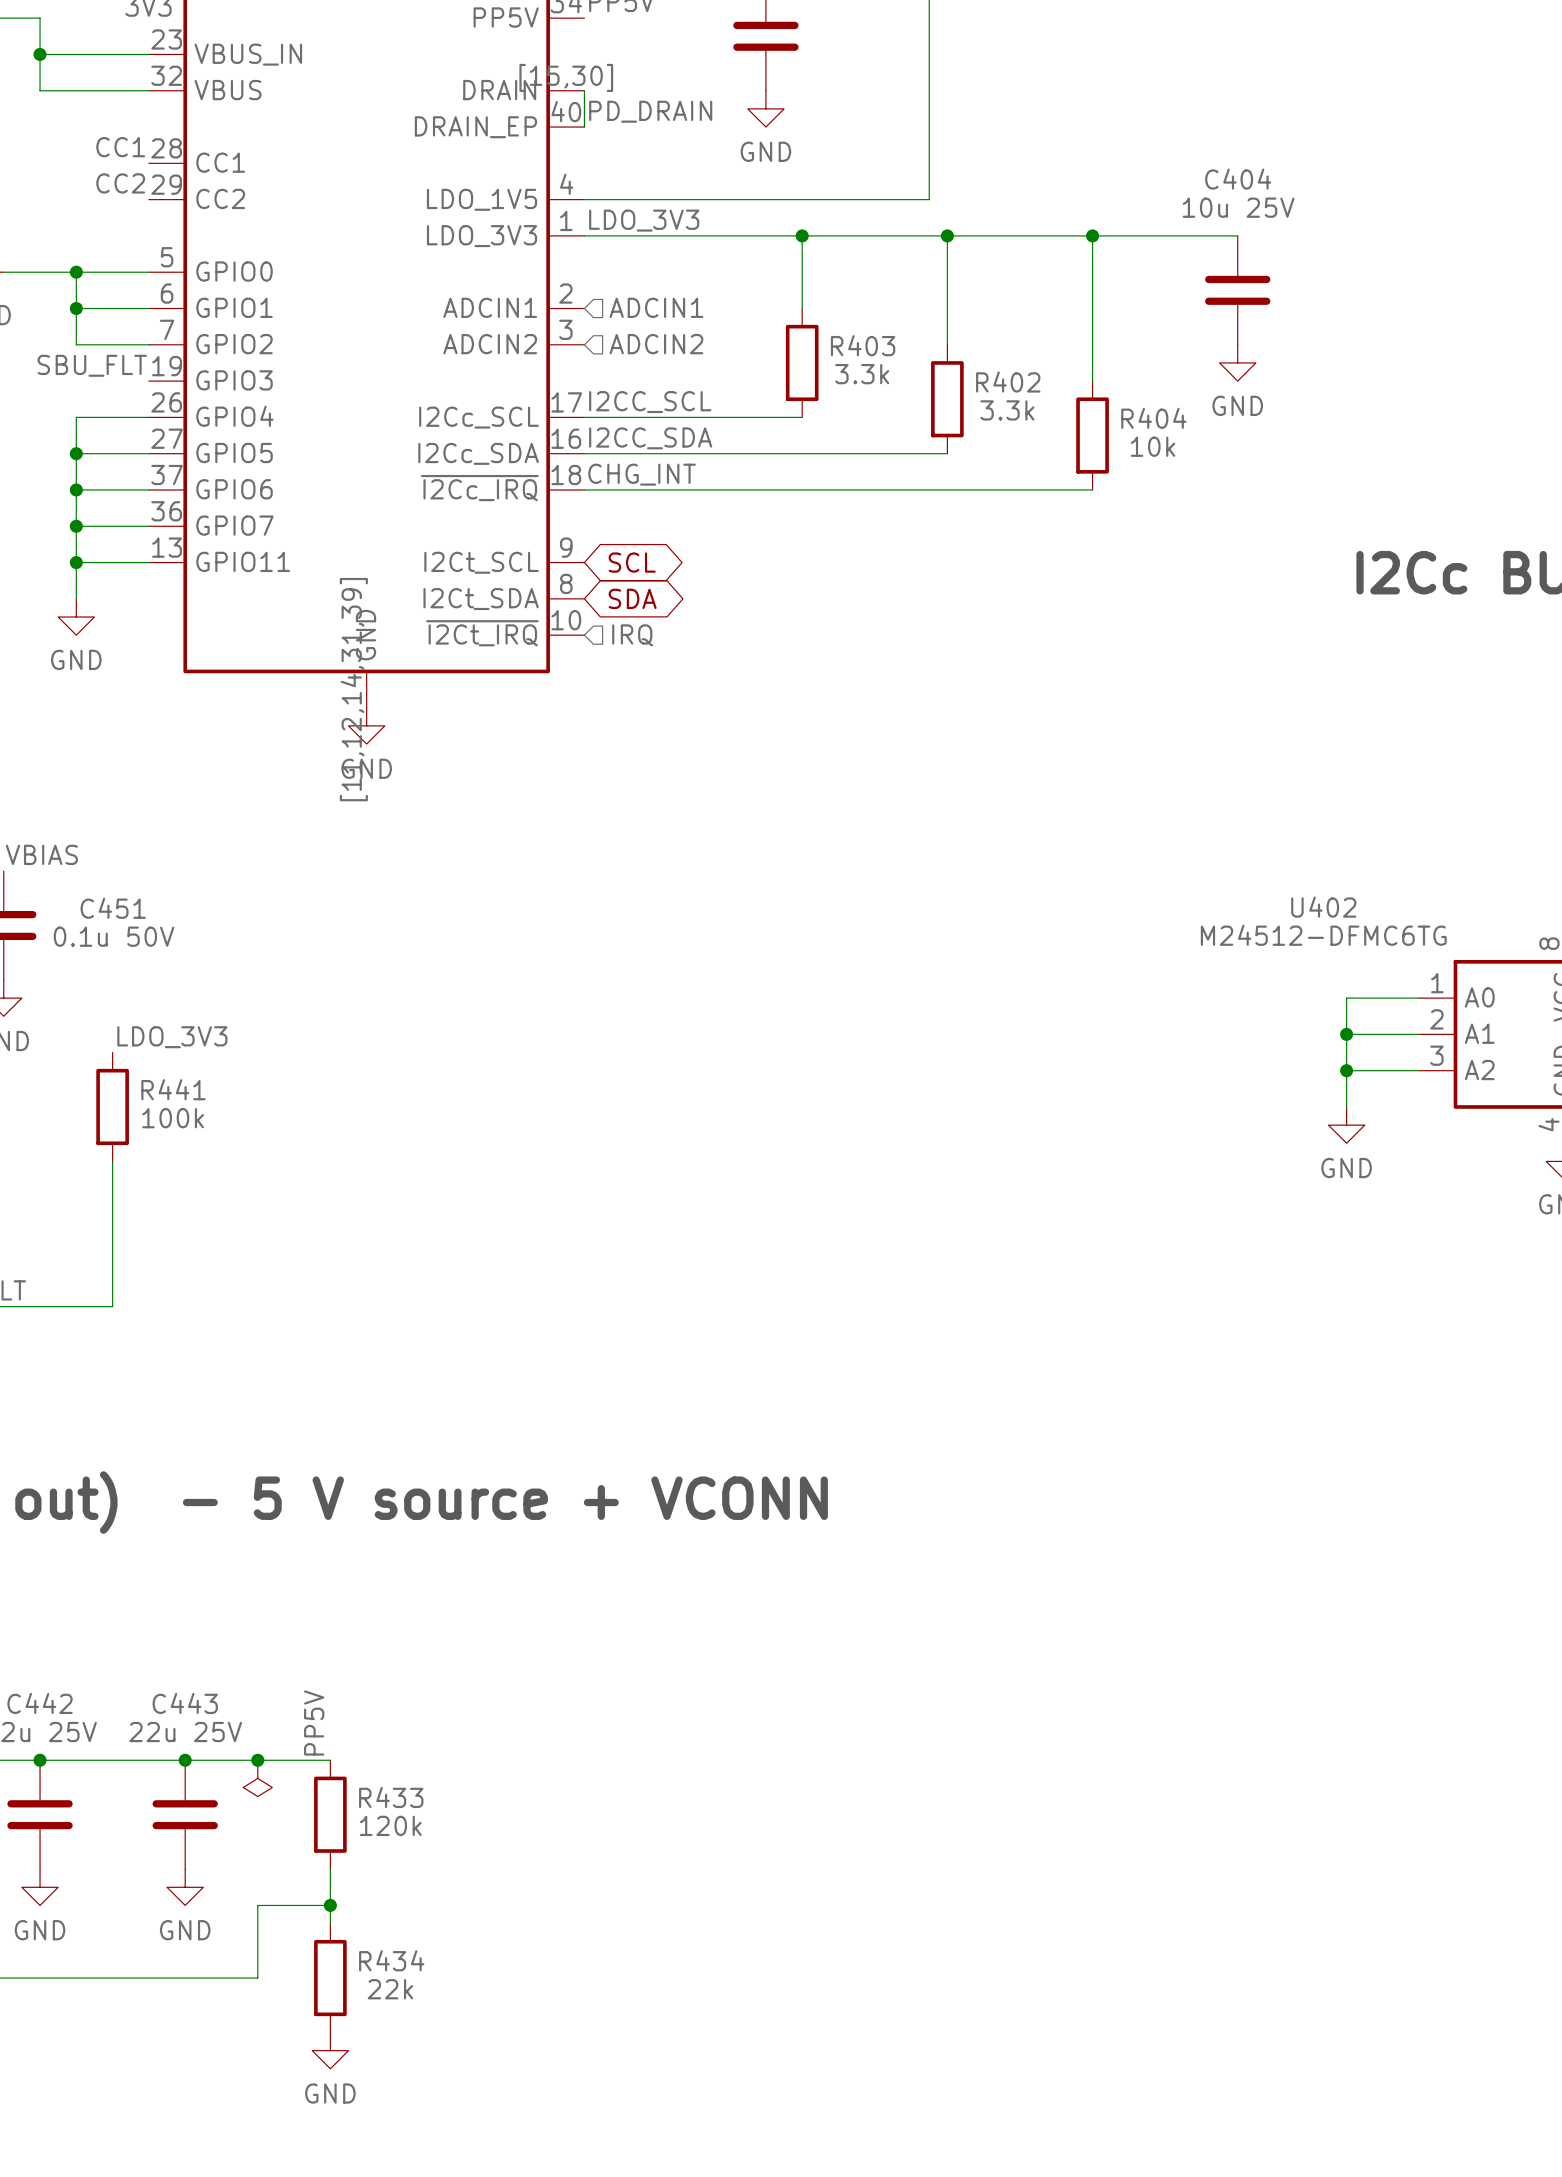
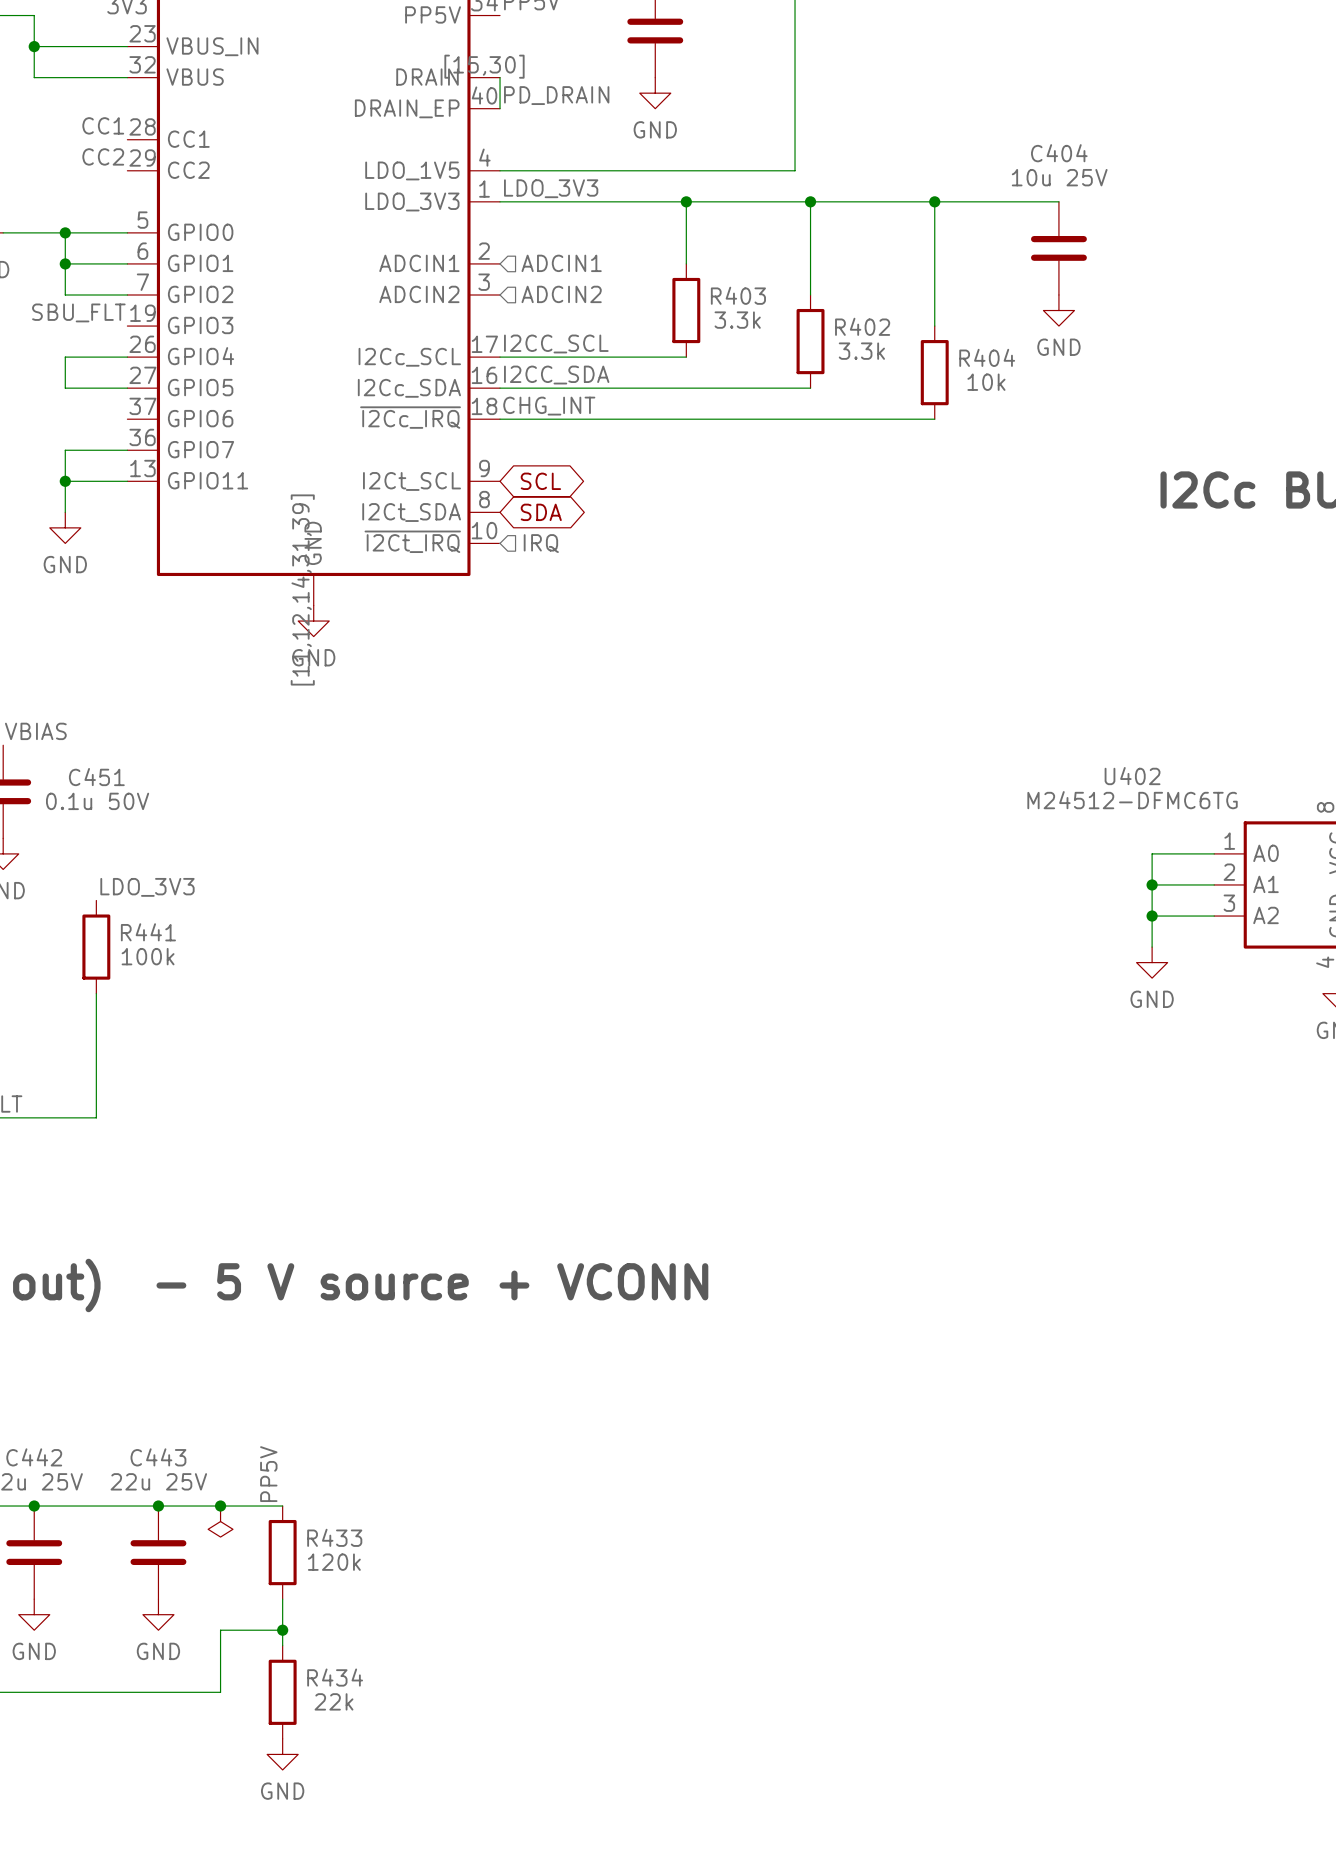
wire: (76, 453) (76, 526) -> none
junction: (76, 453) -> none
wire: (76, 489) (148, 489) -> none
junction: (76, 489) -> none
junction: (76, 526) -> none

